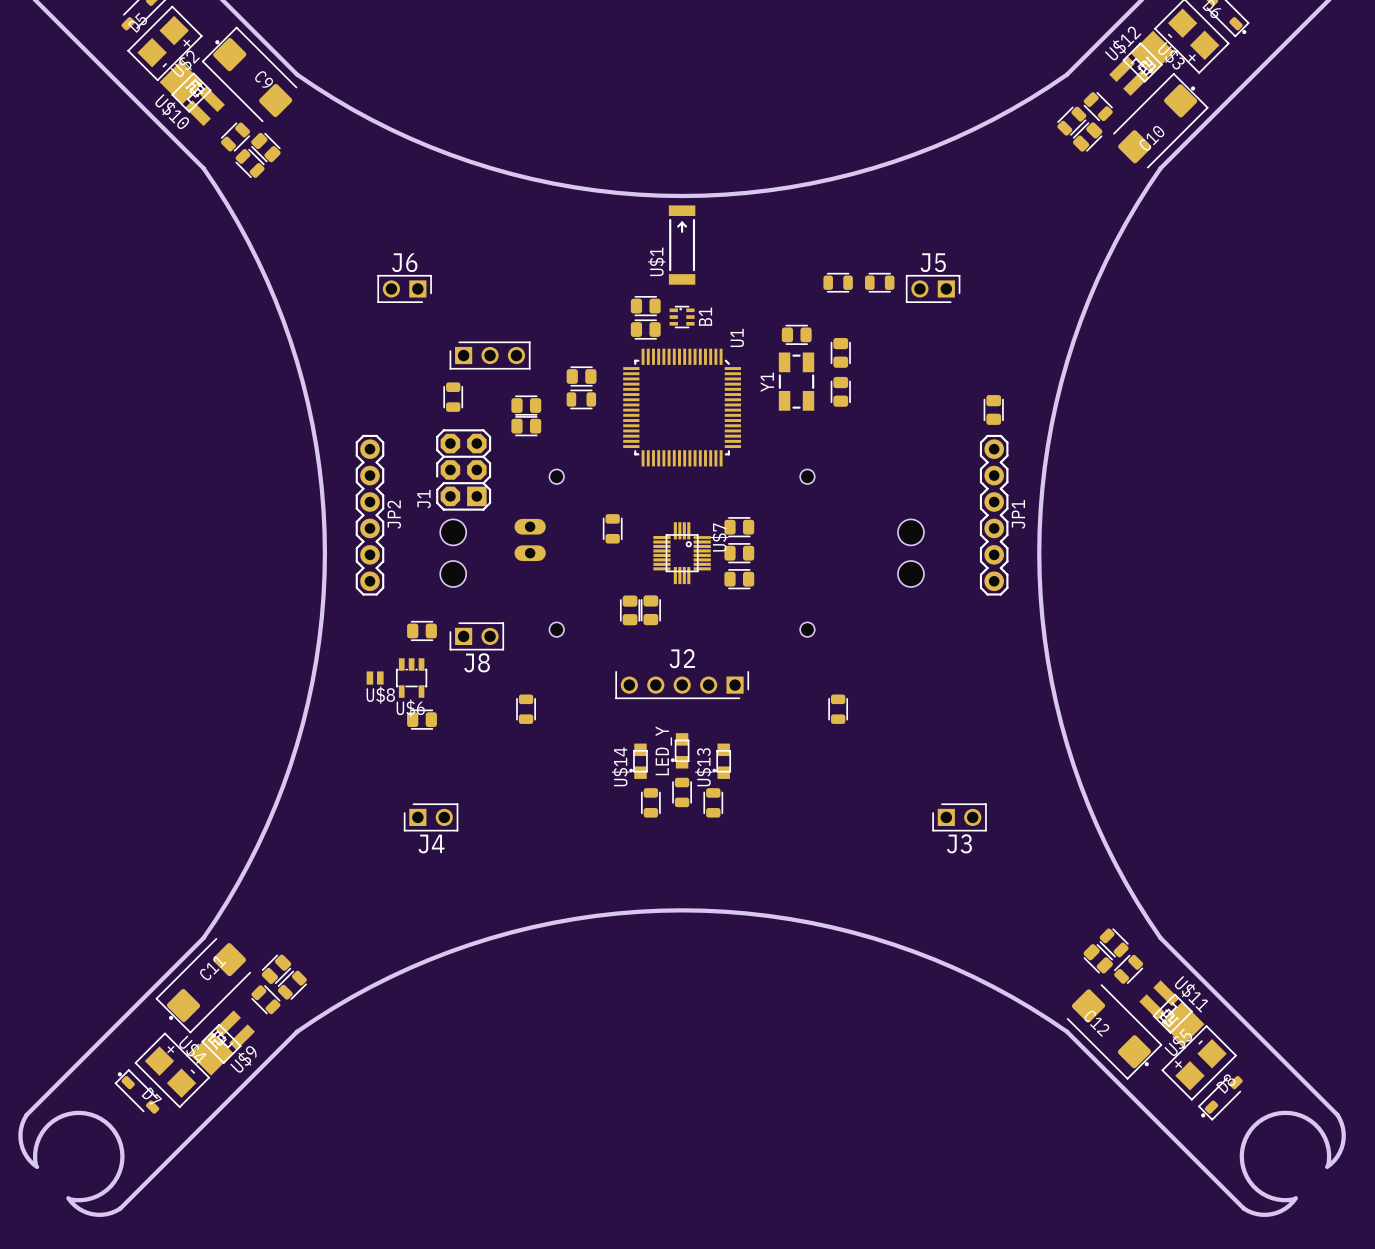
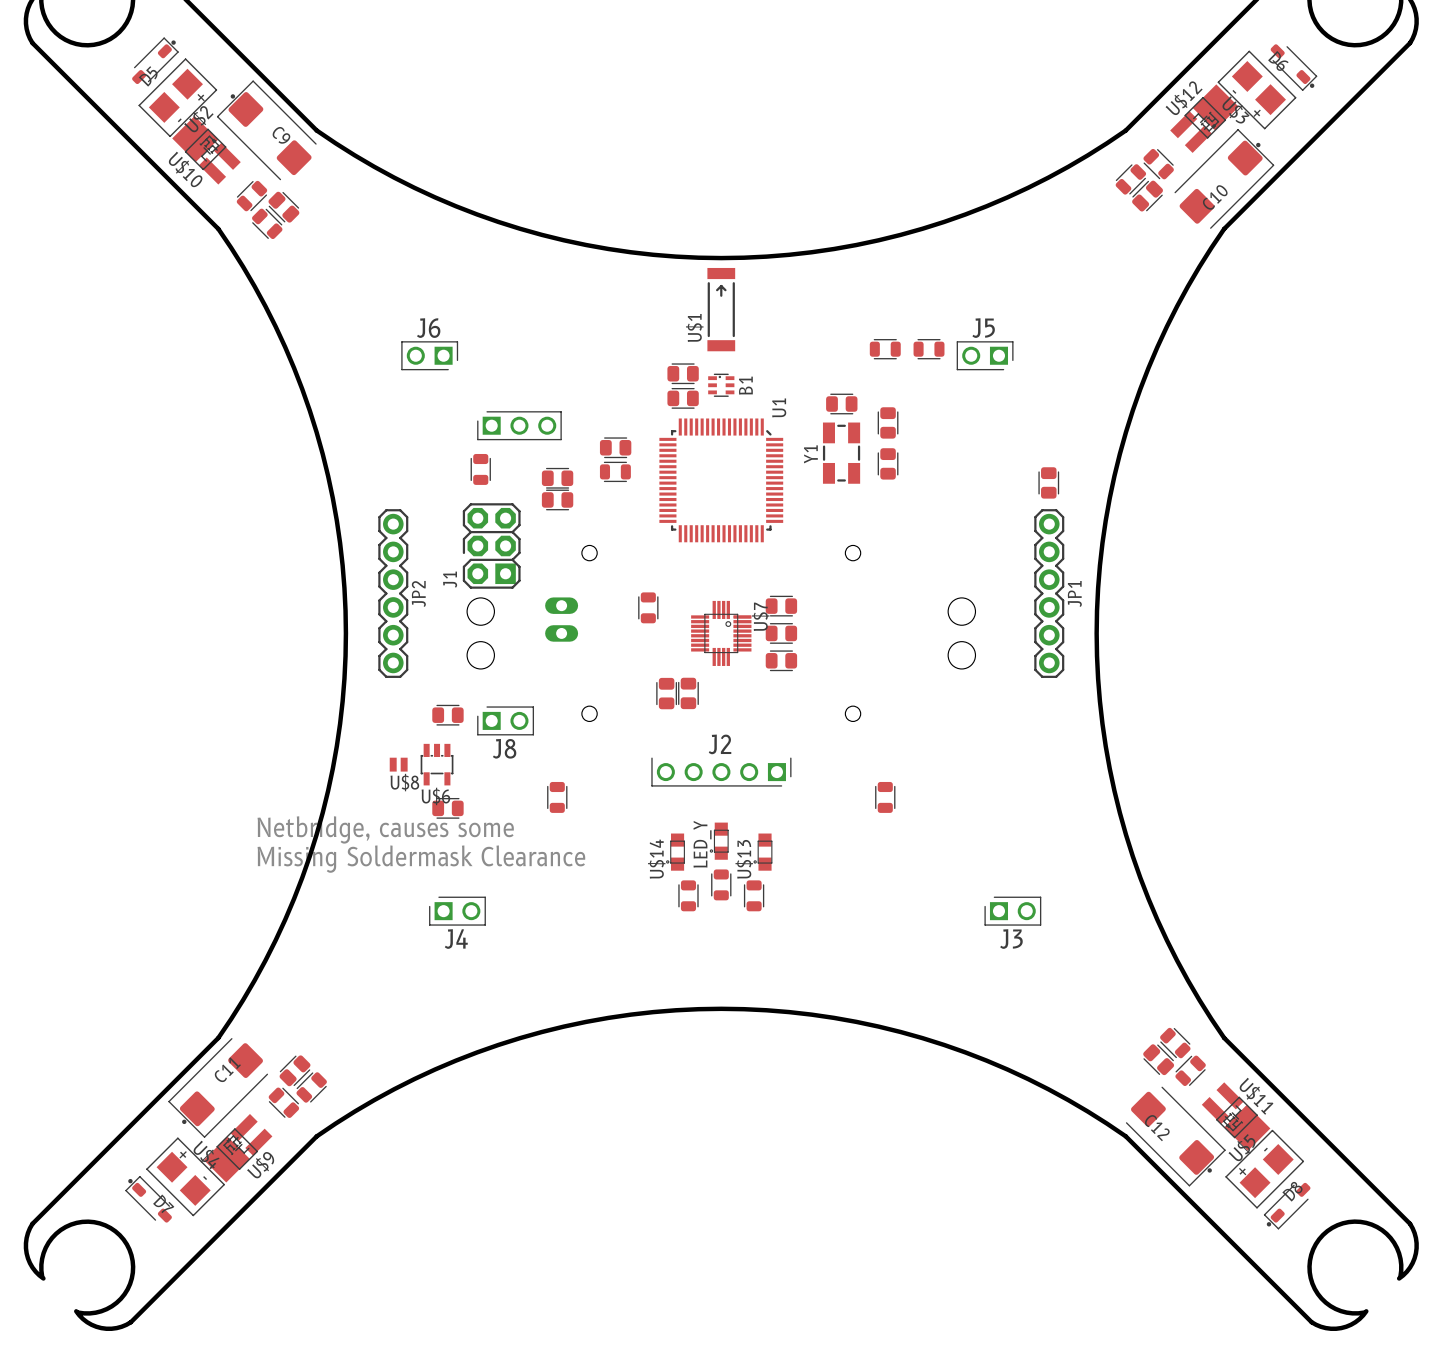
text: none -> Netbridge, causes some (385, 829)
text: none -> Missing Soldermask Clearance (421, 859)

